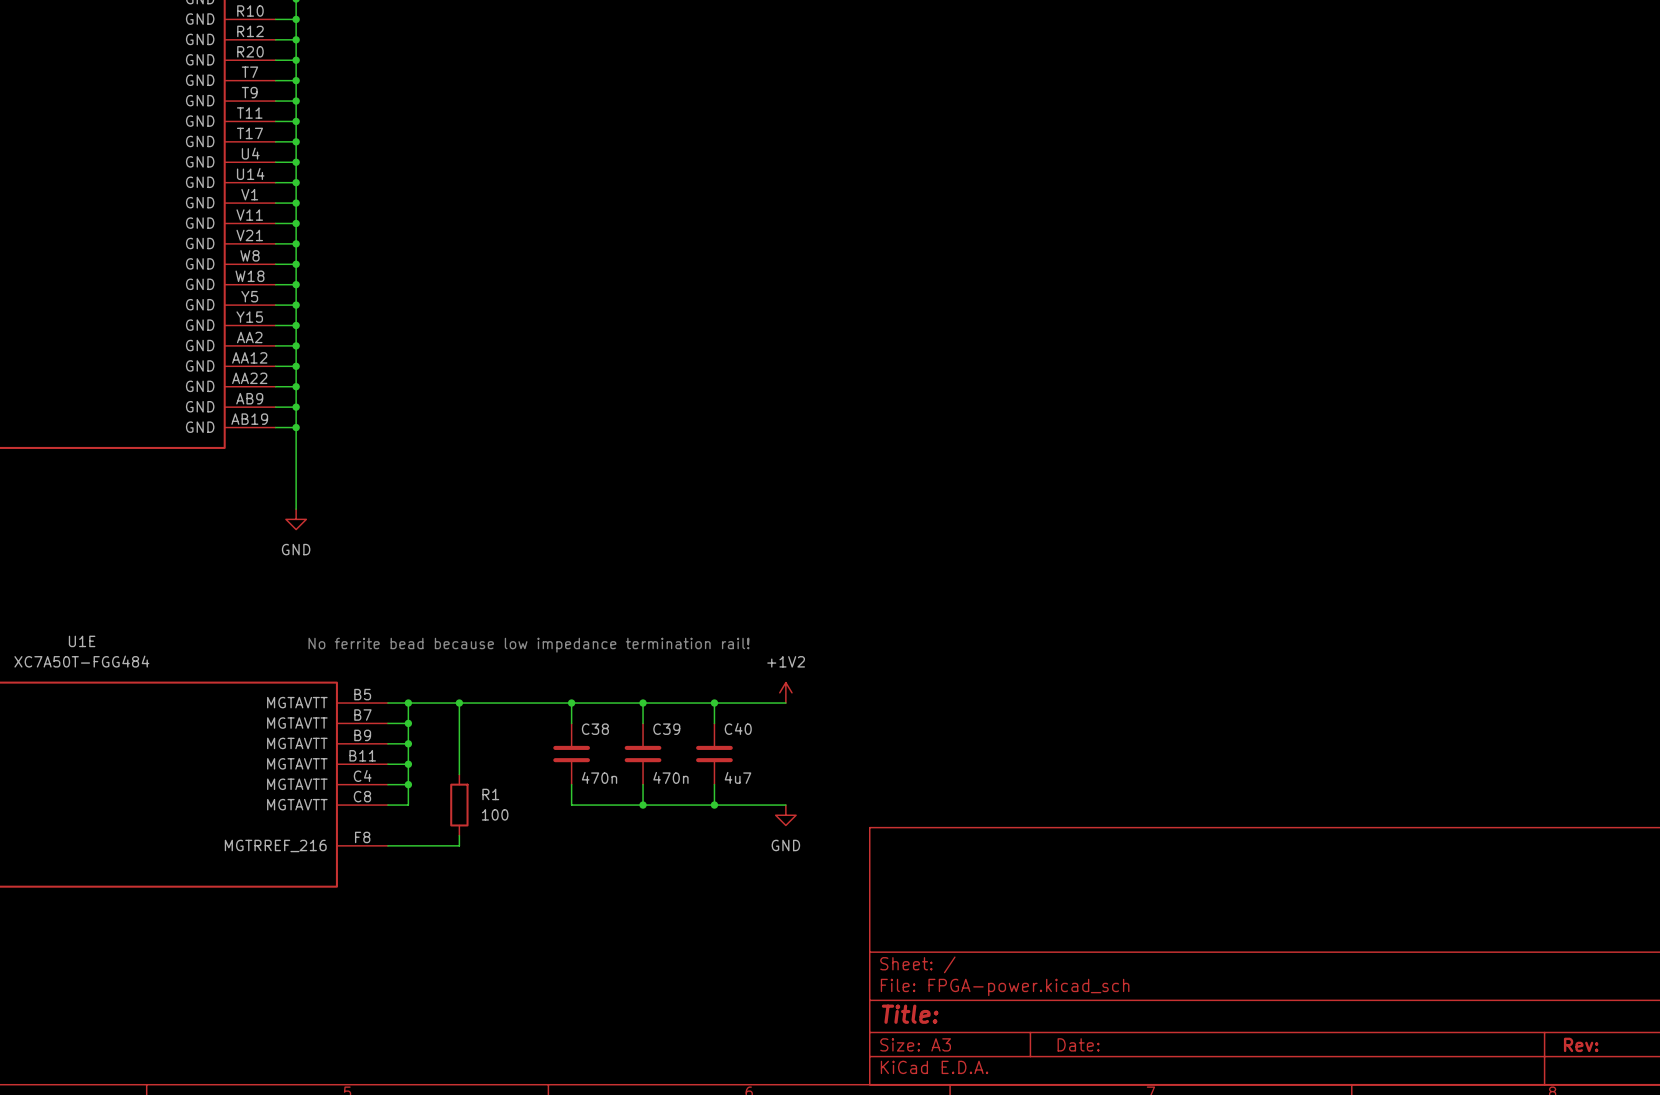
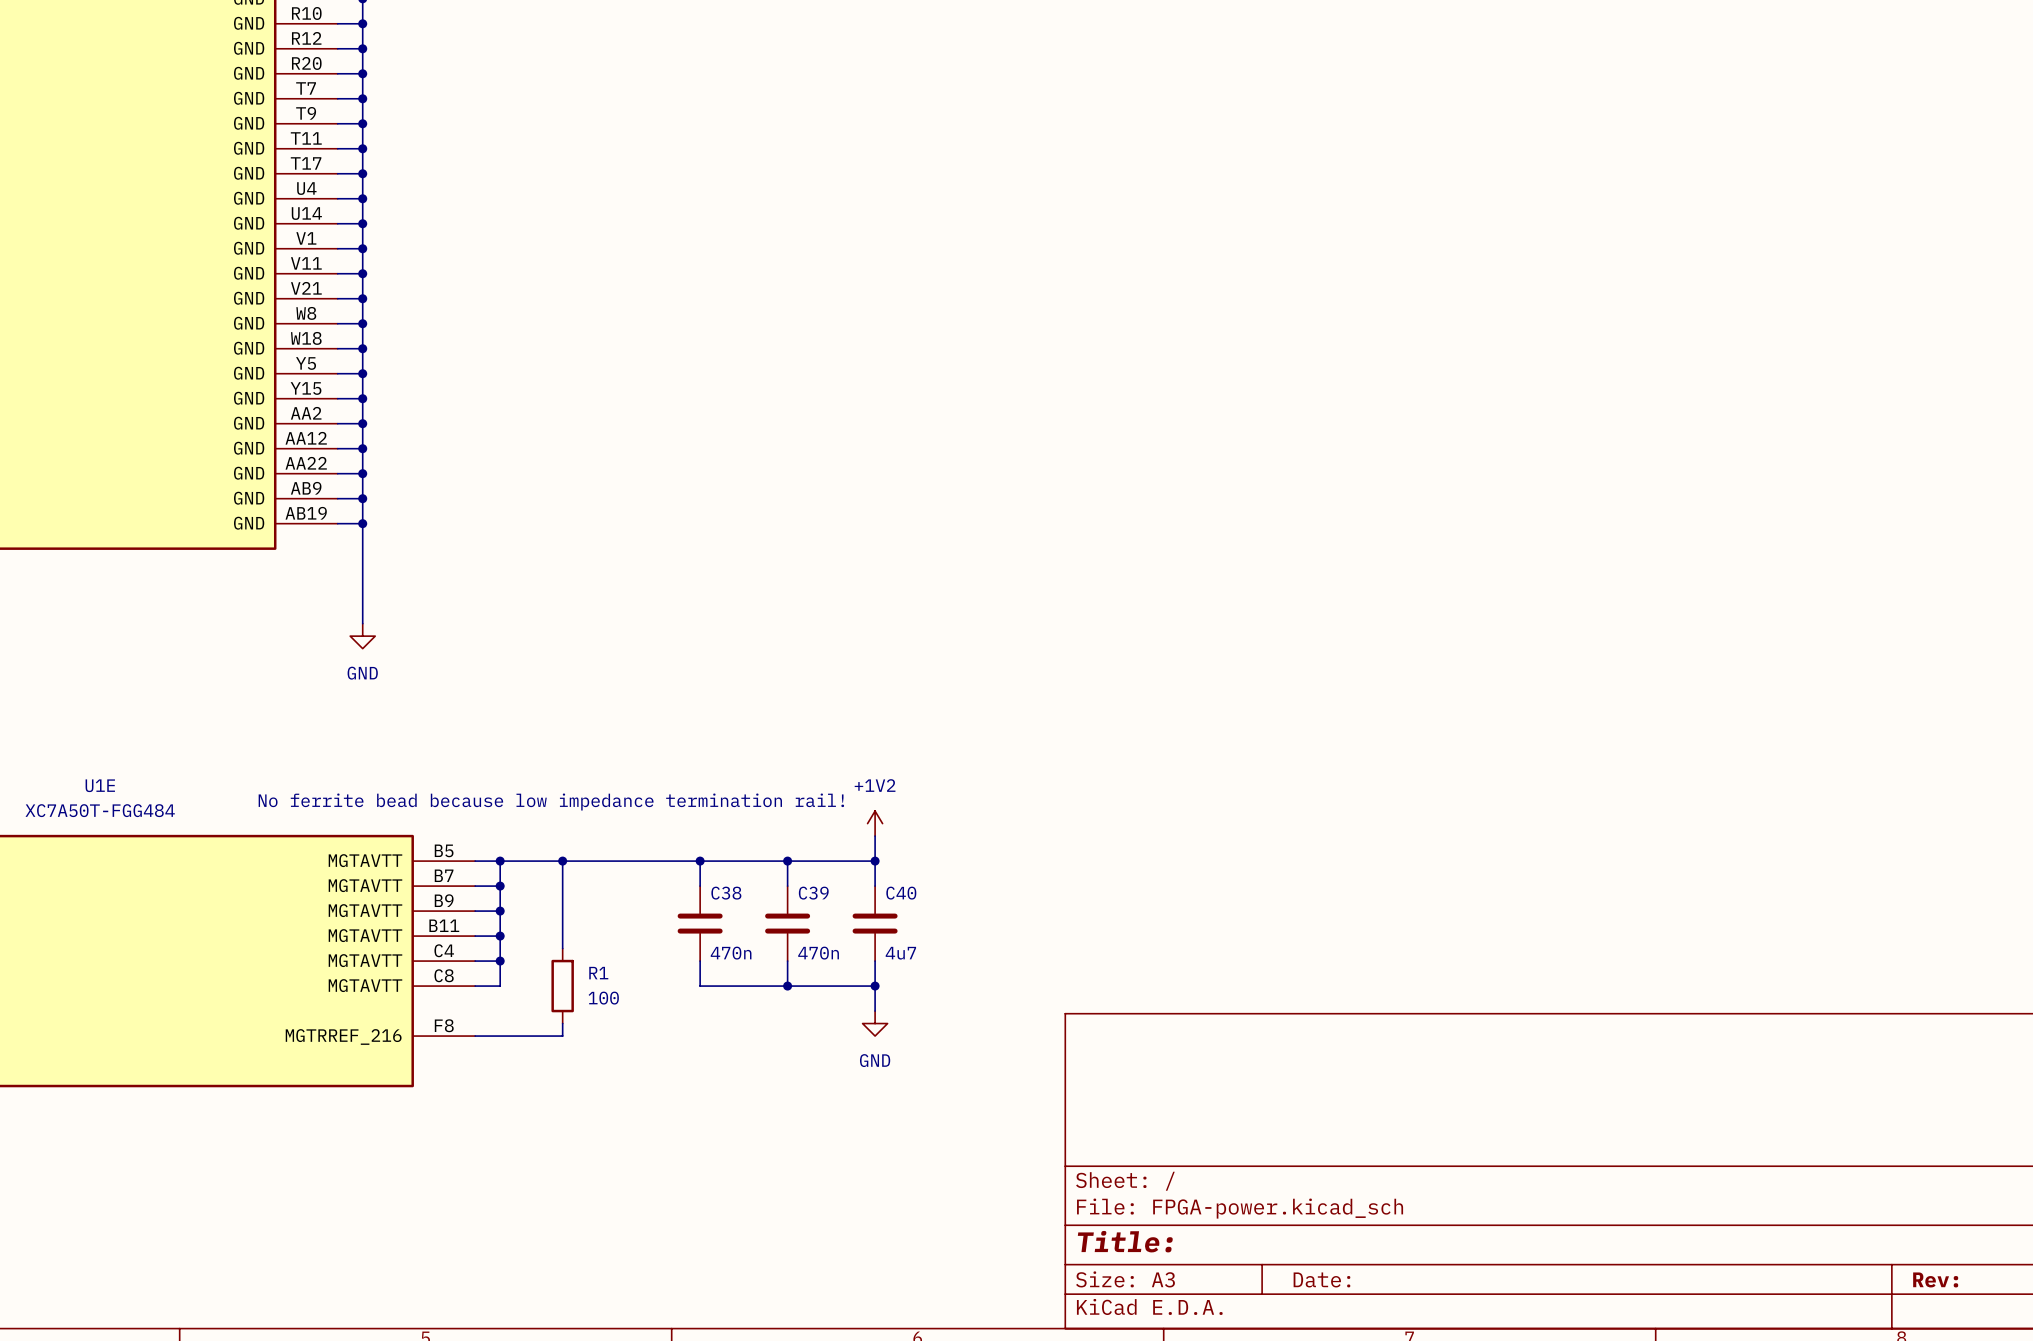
text position: No ferrite bead because low impedance termination rail! (529, 645) -> No ferrite bead because low impedance termination rail! (551, 802)
power symbol position: +1V2 (785, 692) -> +1V2 (875, 823)
wire: (714, 703) (785, 703) -> (875, 861) (875, 836)
wire: (714, 805) (785, 805) -> (875, 986) (875, 1011)
power symbol position: GND (785, 815) -> GND (875, 1023)

